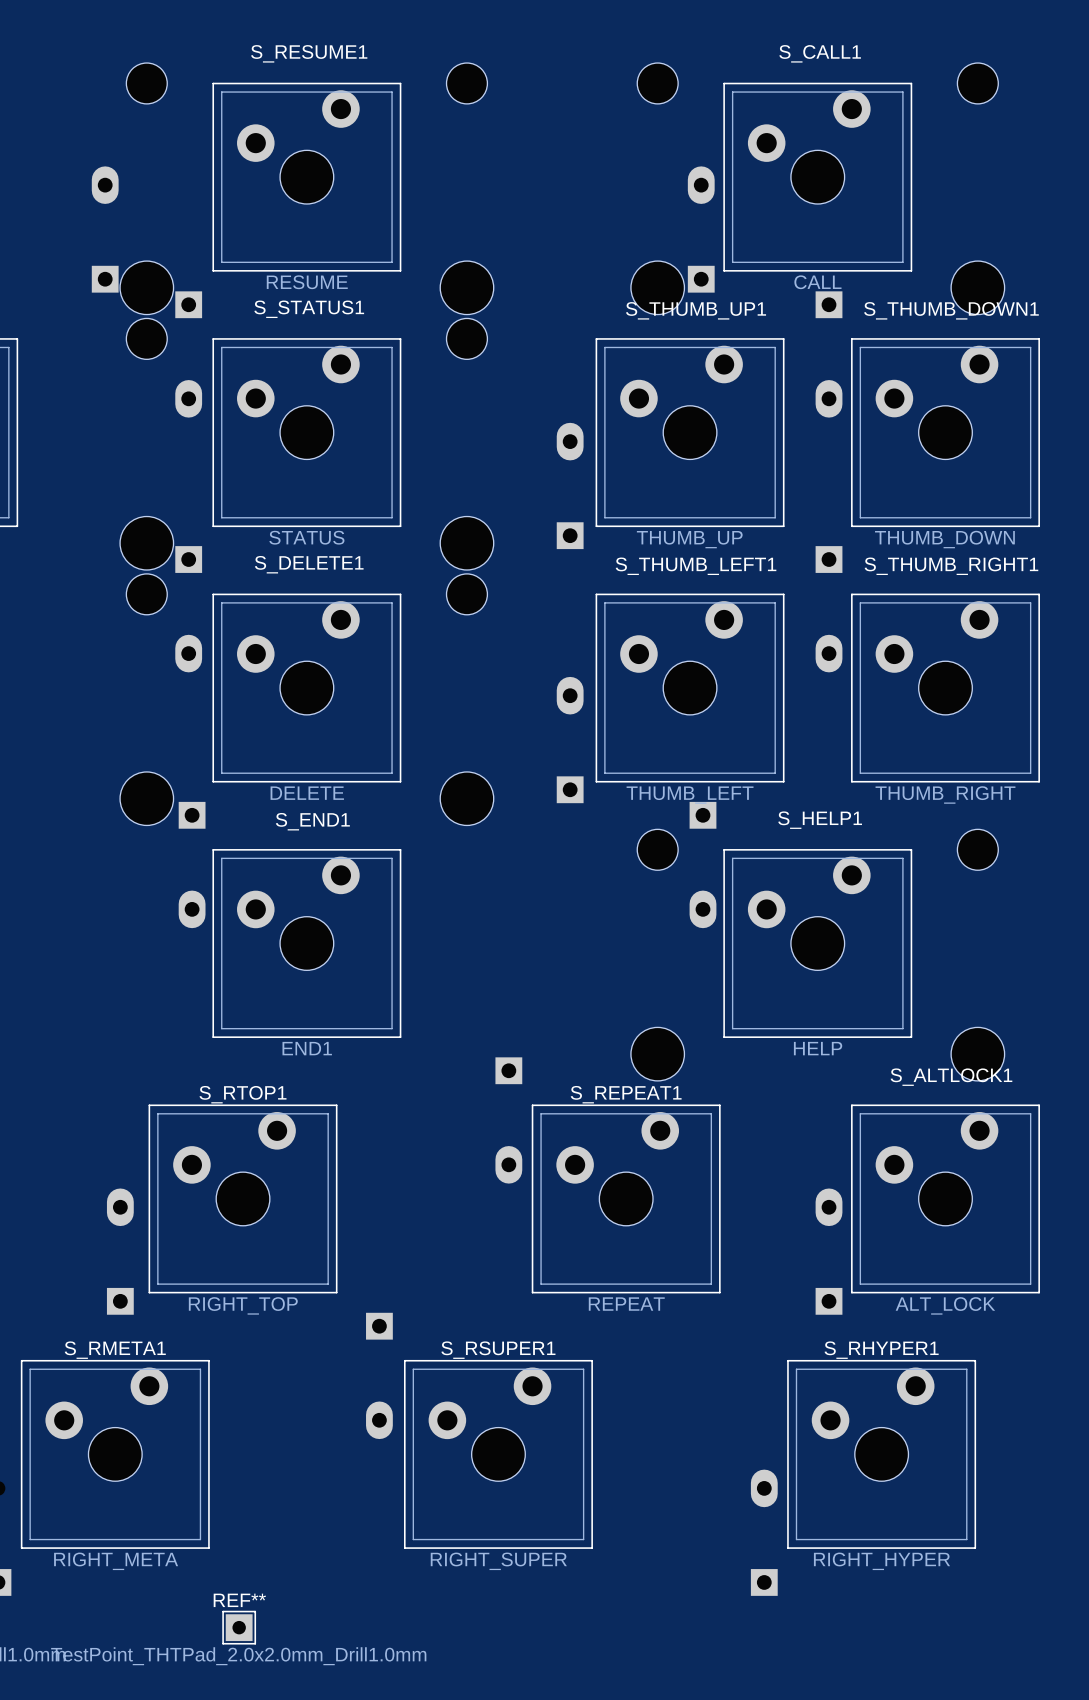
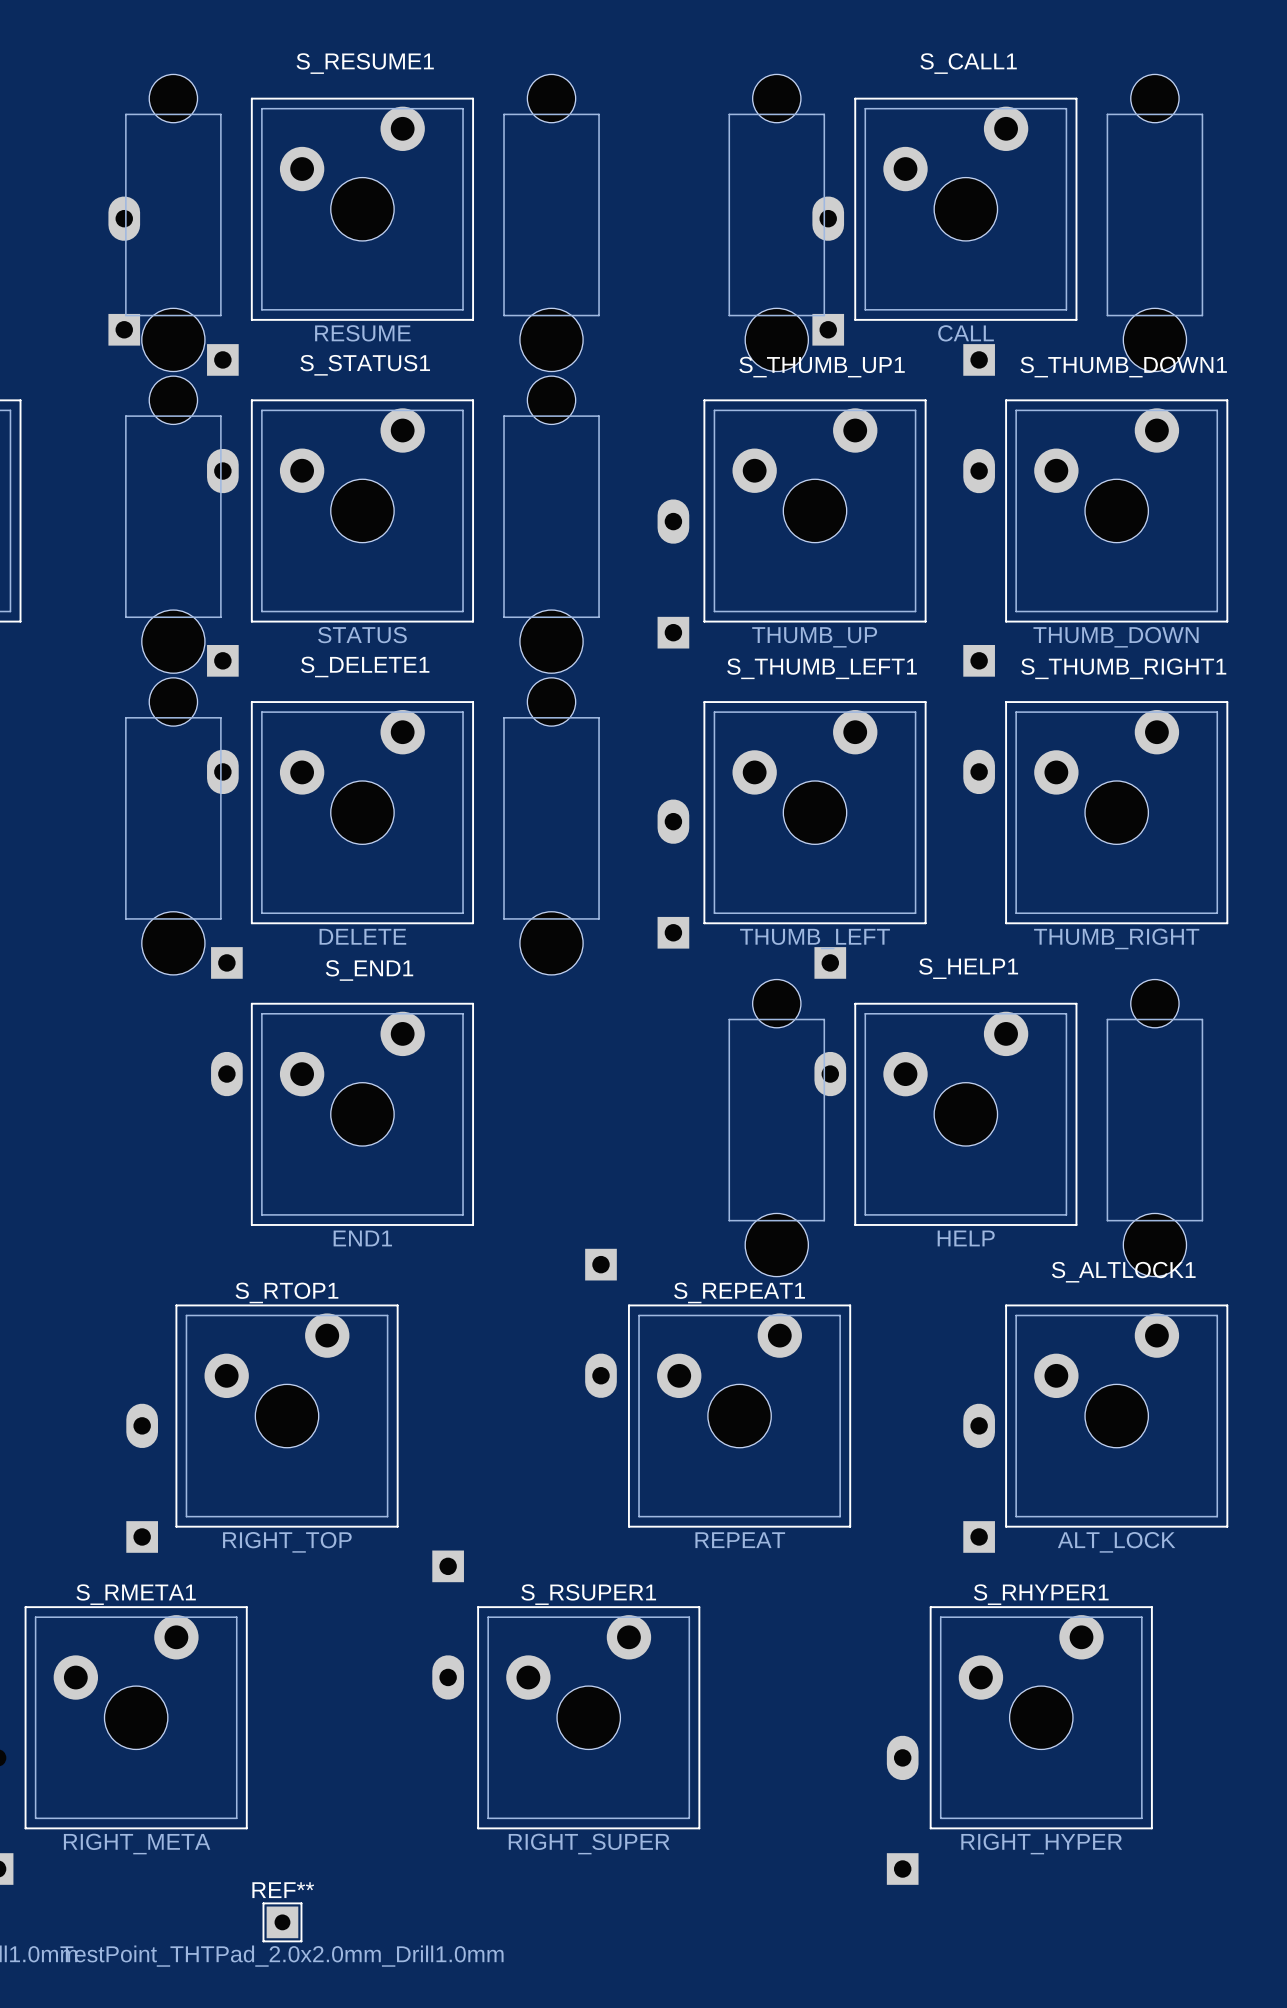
S_RESUME1 footprint: [120, 63, 494, 315] -> [125, 74, 600, 372]
S_CALL1 footprint: [630, 63, 1005, 315] -> [728, 74, 1204, 372]
S_STATUS1 footprint: [120, 318, 494, 571] -> [125, 376, 600, 674]
S_DELETE1 footprint: [120, 573, 494, 826] -> [125, 677, 600, 975]
S_HELP1 footprint: [630, 829, 1005, 1081] -> [728, 979, 1204, 1277]

